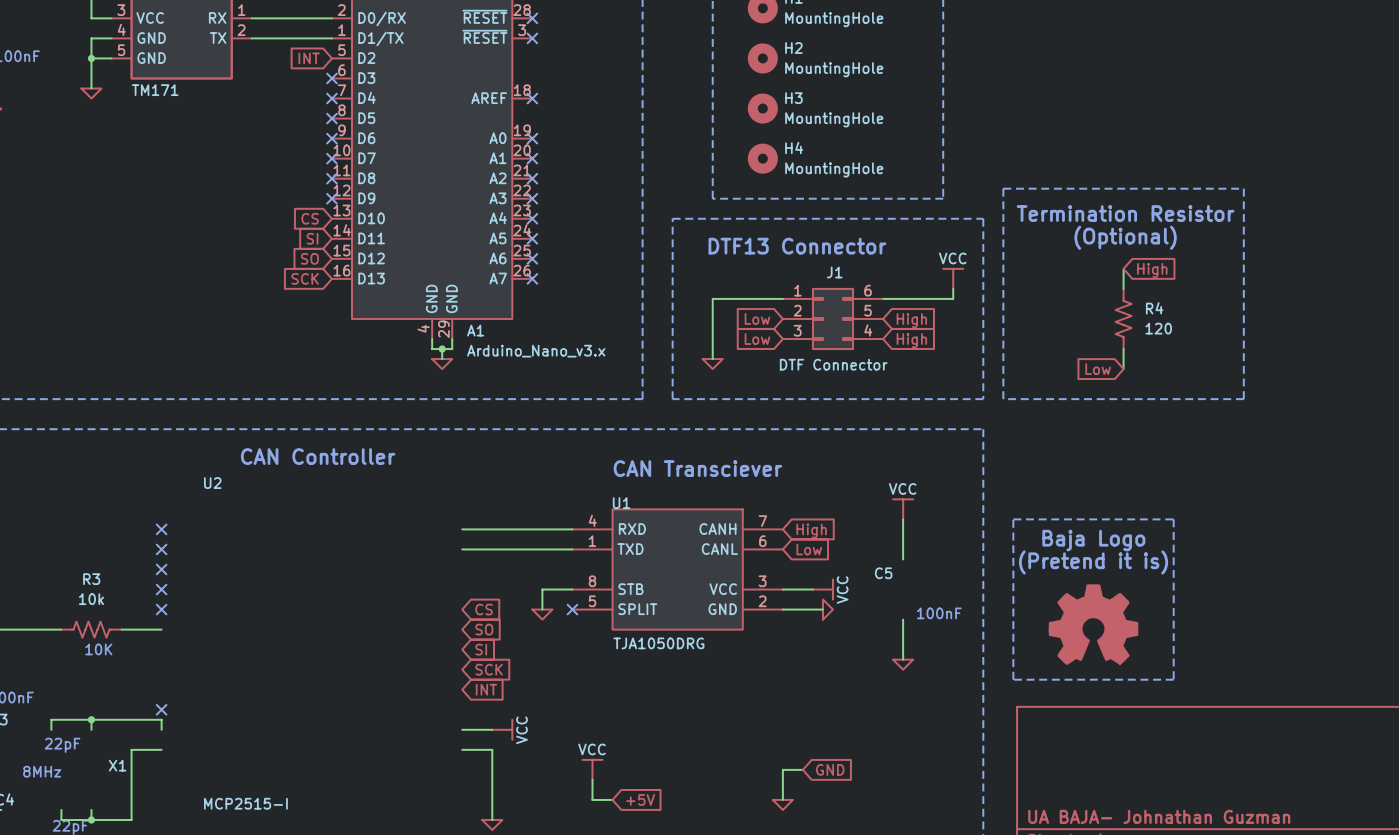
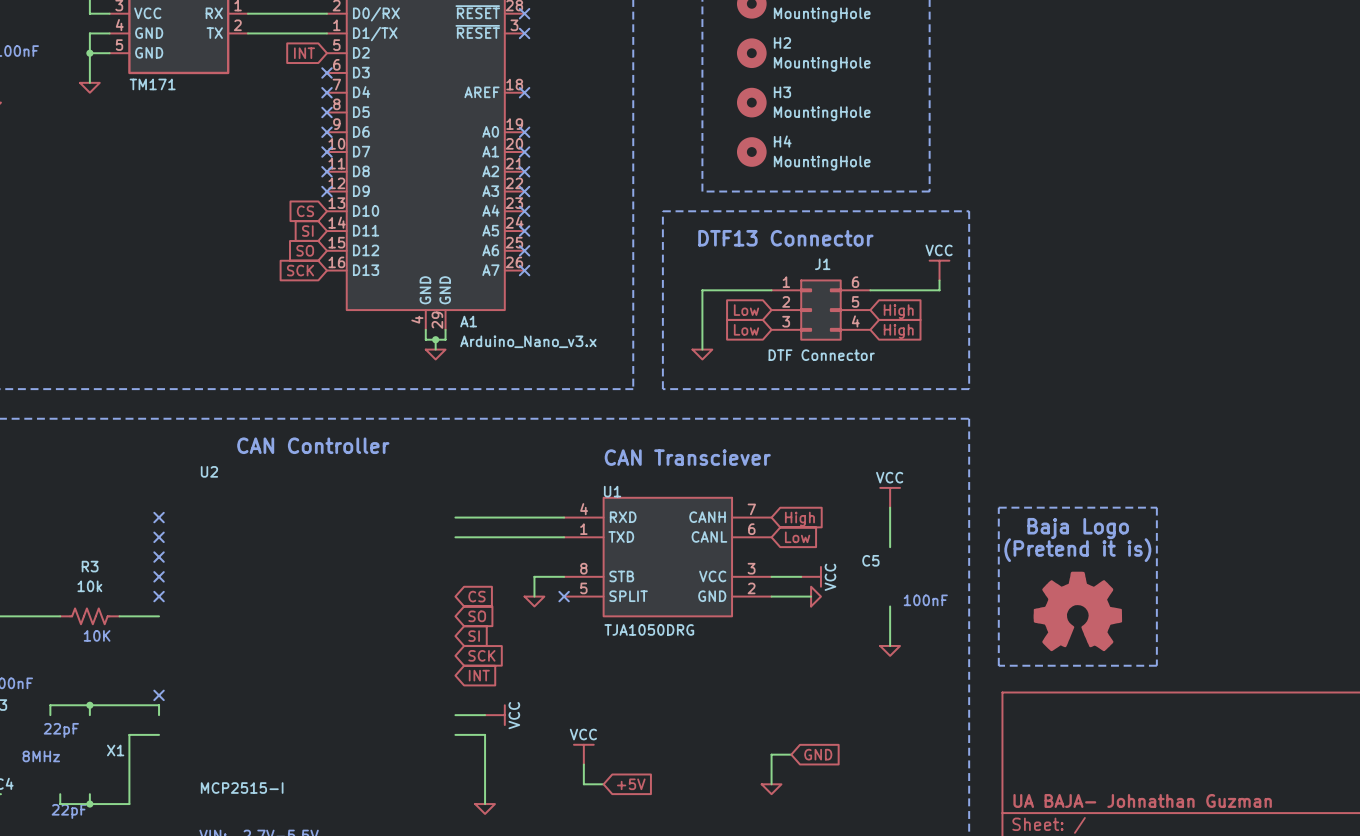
line: (1003, 188) (1243, 188) (1243, 399) (1003, 399) (1003, 188) -> none
text: Termination Resistor (1125, 213) -> none
text: (Optional) (1125, 237) -> none
wire: (1123, 268) (1123, 288) -> none
global label: High (1152, 270) -> none
R4: 120 (1123, 318) -> none
wire: (1123, 349) (1123, 369) -> none
global label: Low (1098, 369) -> none

